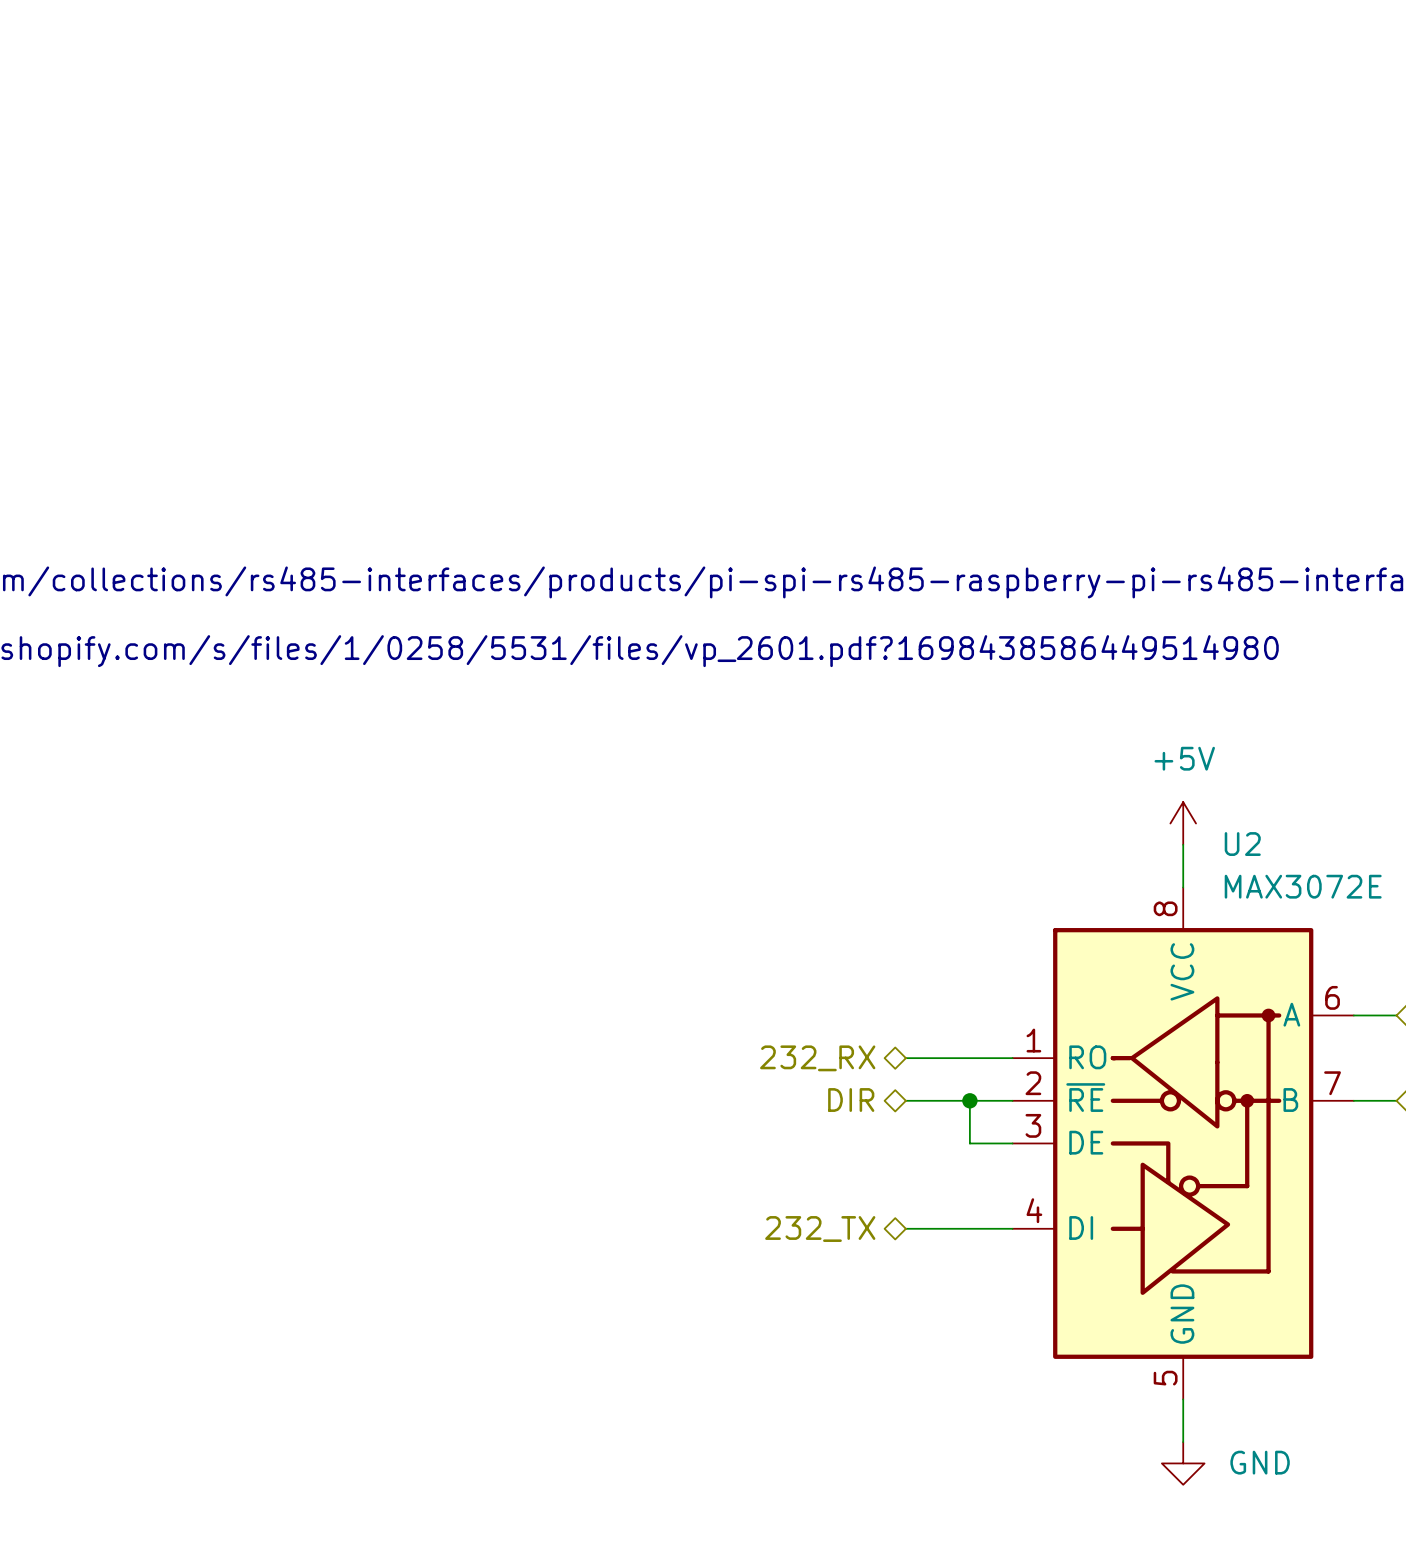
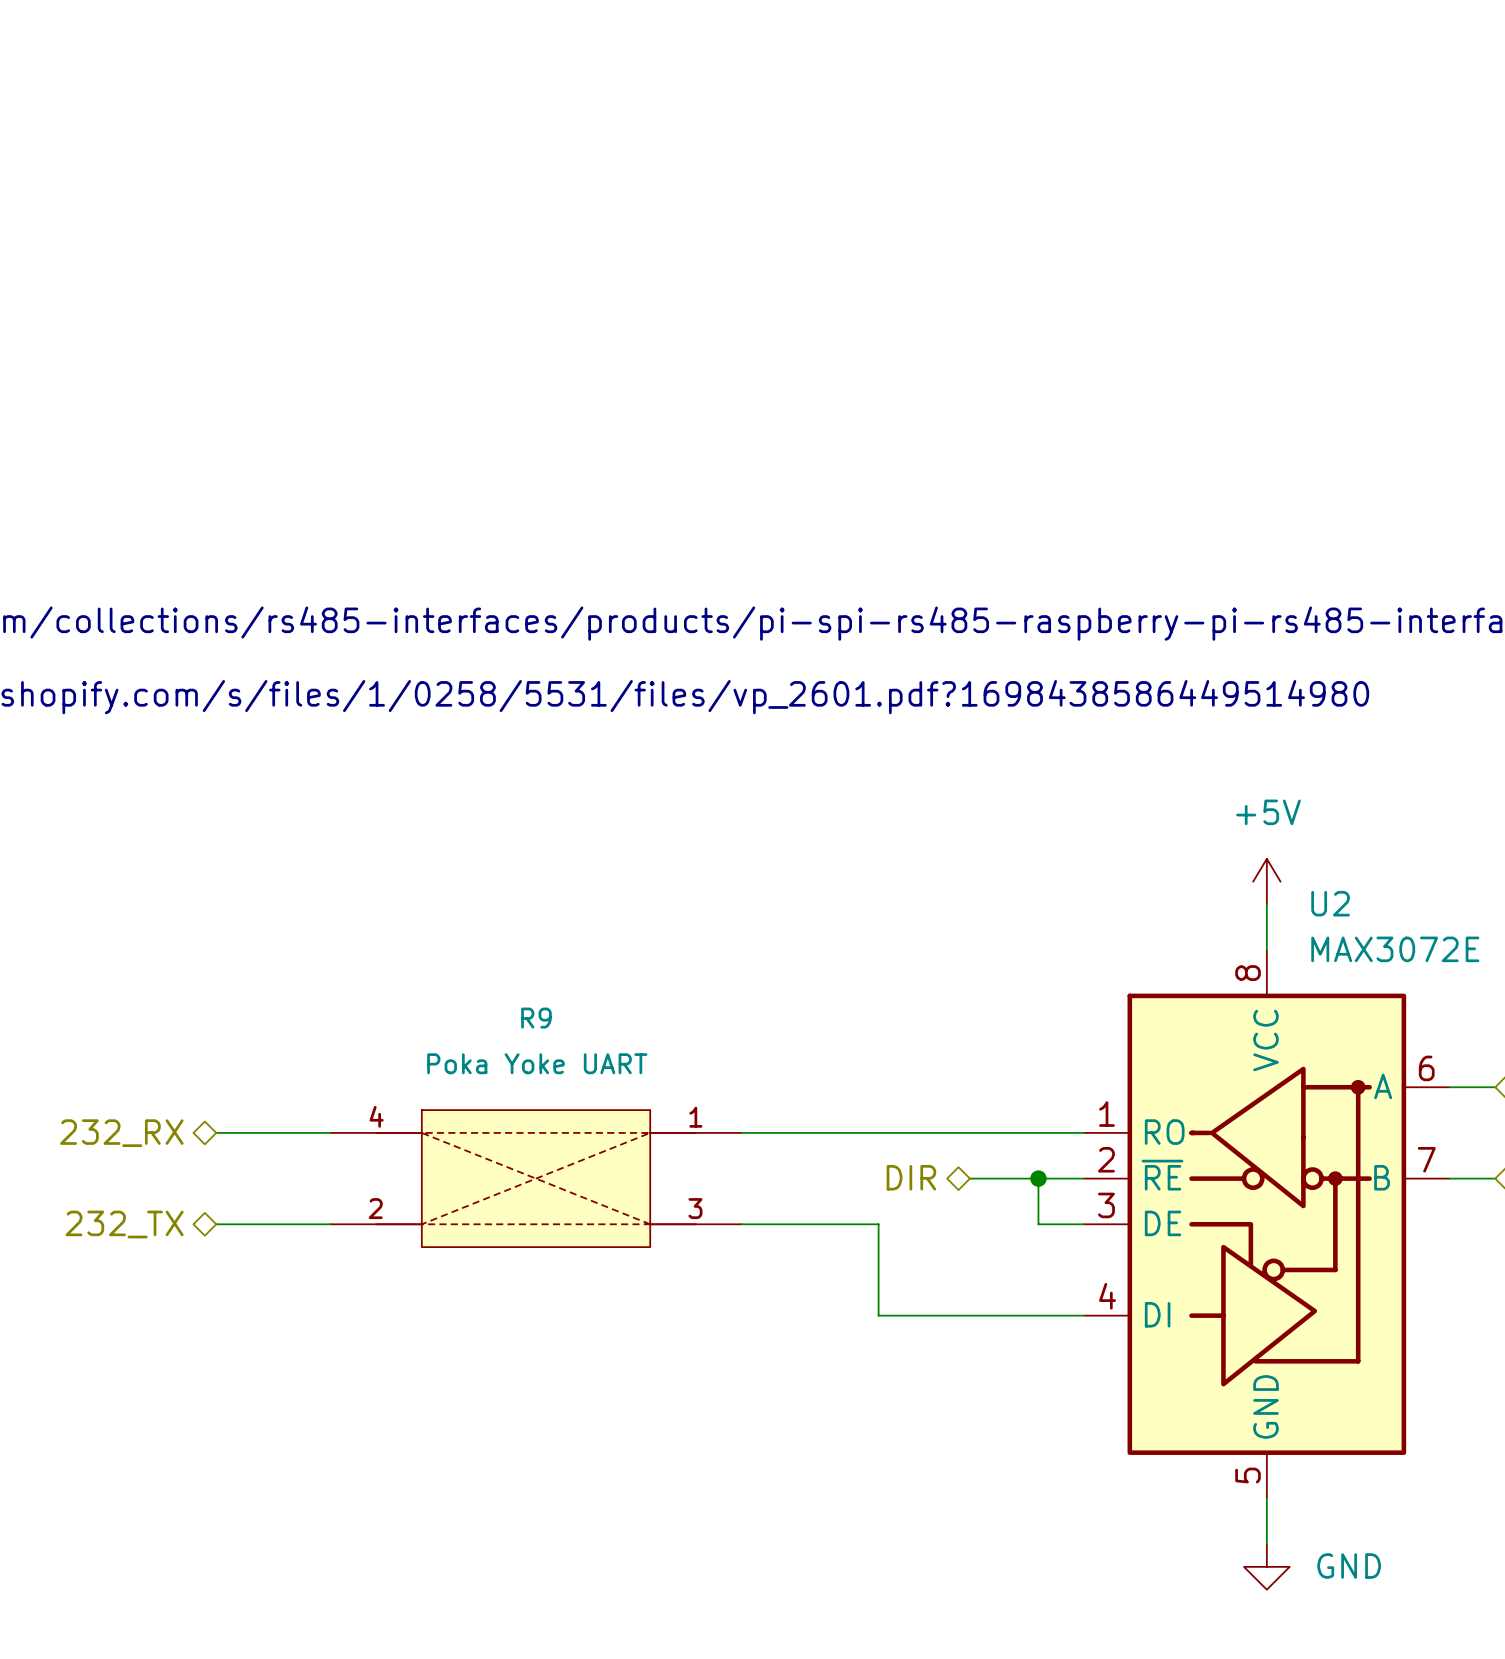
hierarchical label: none -> 232_RX (121, 1133)
wire: none -> (216, 1132) (330, 1132)
wire: none -> (741, 1132) (969, 1132)
hierarchical label: 232_RX (817, 1058) -> none
R9: none -> Poka Yoke UART (536, 1178)
hierarchical label: none -> 232_TX (124, 1224)
wire: none -> (216, 1224) (330, 1224)
wire: none -> (741, 1224) (878, 1224) (878, 1315) (969, 1315)
hierarchical label: 232_TX (820, 1229) -> none

